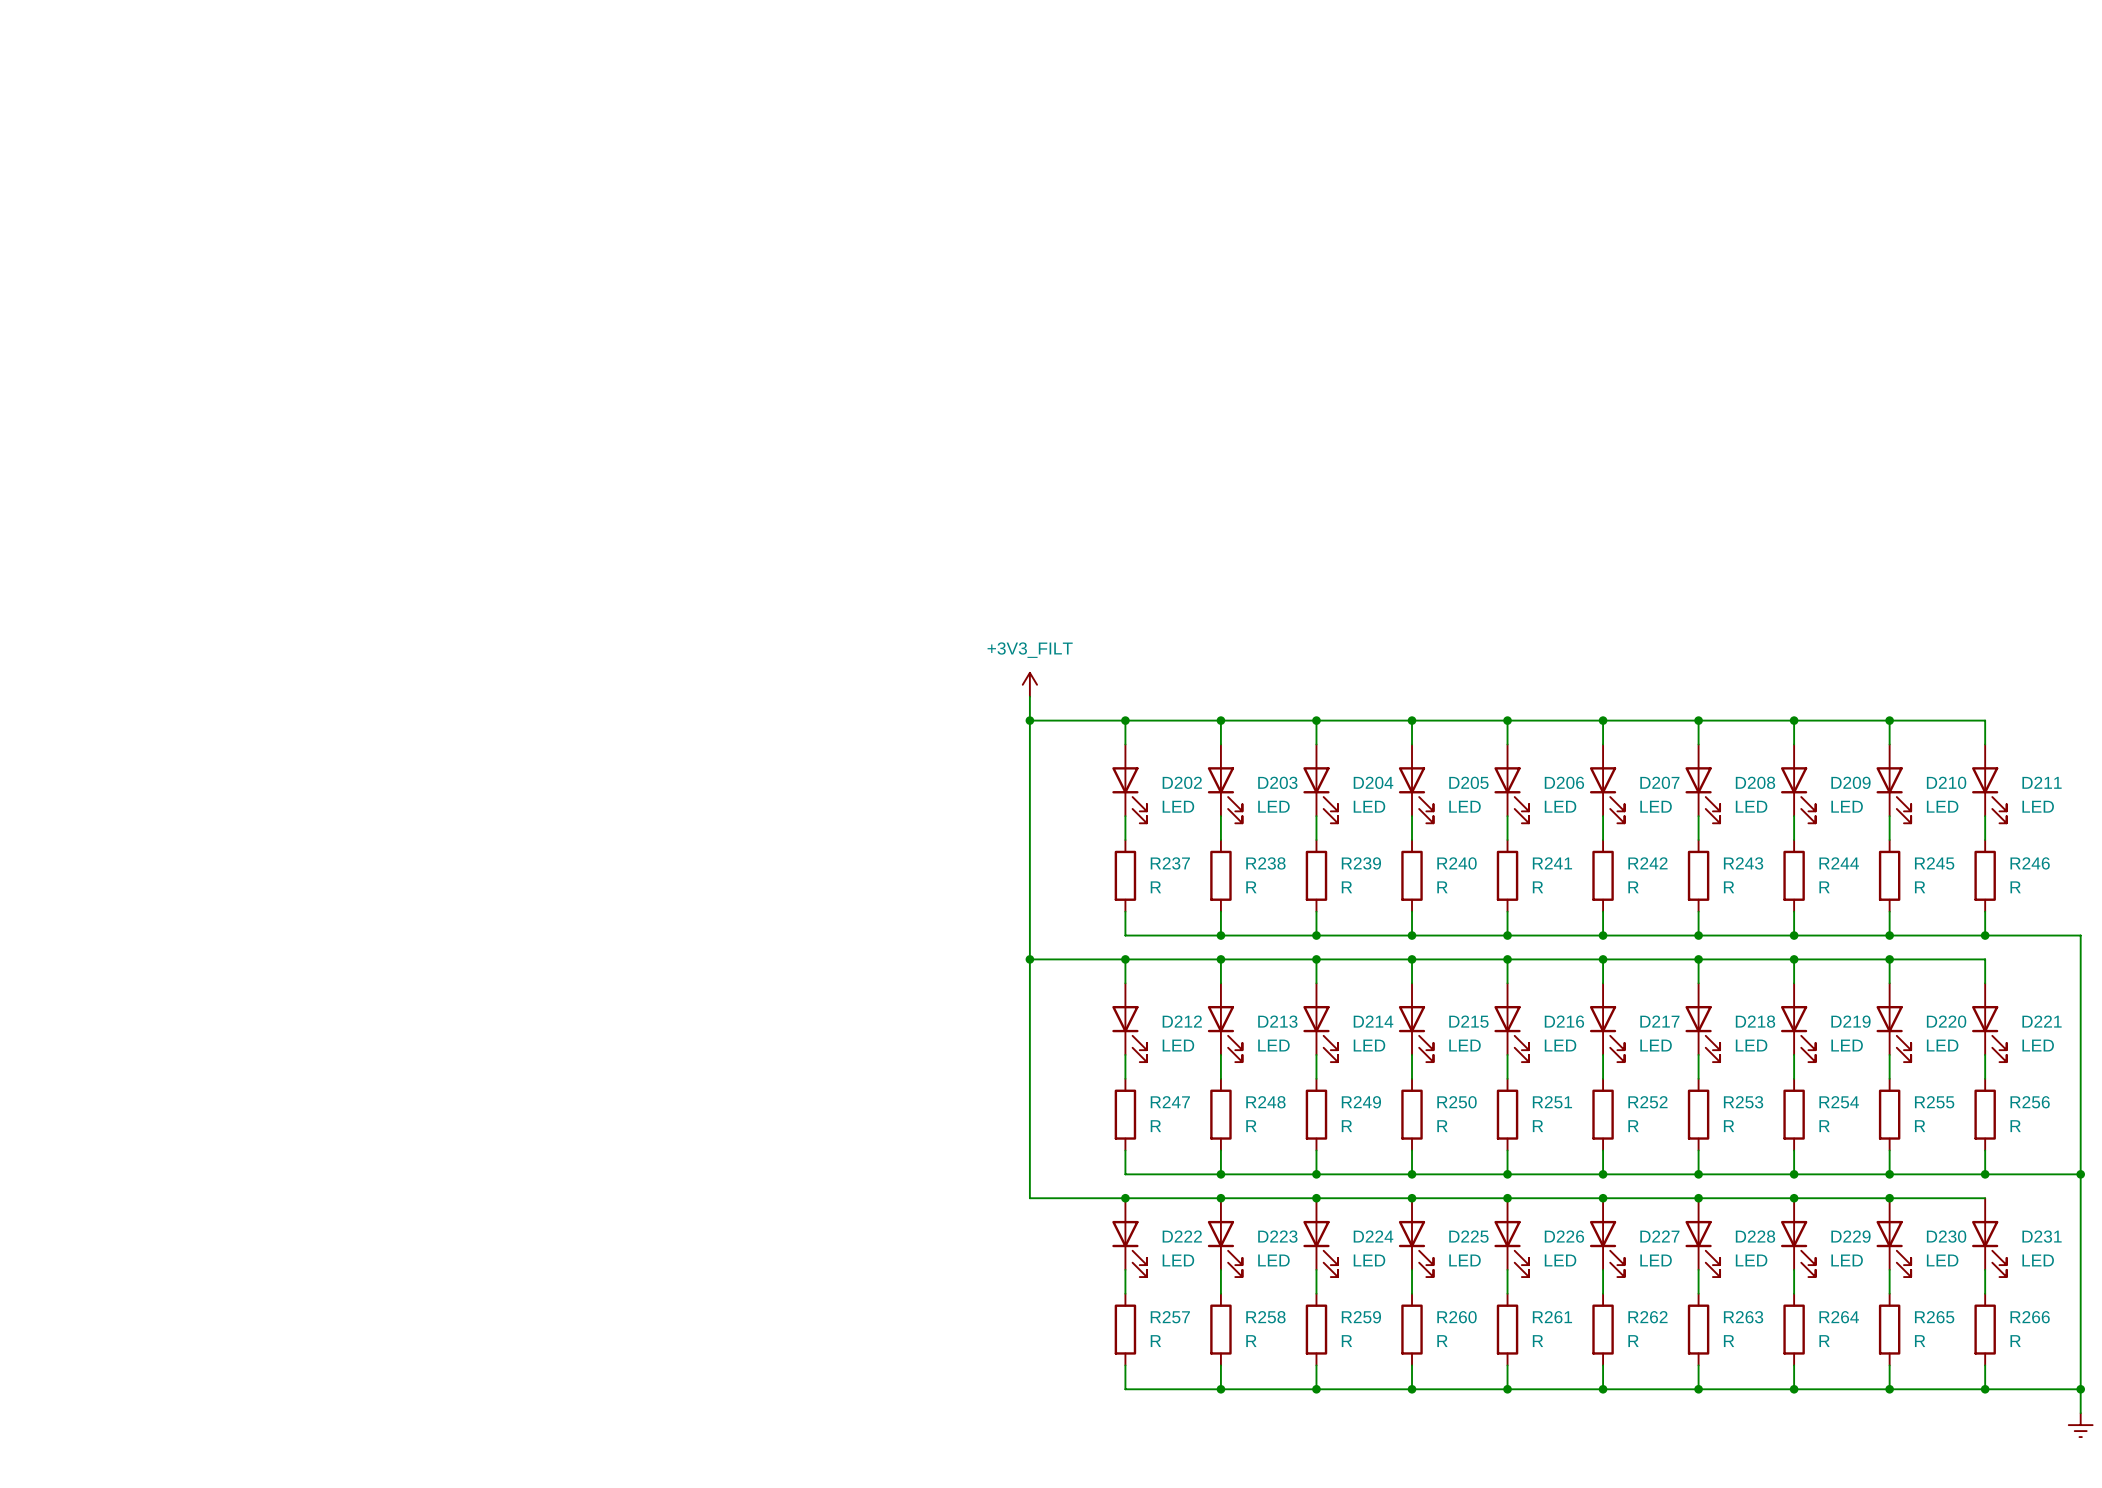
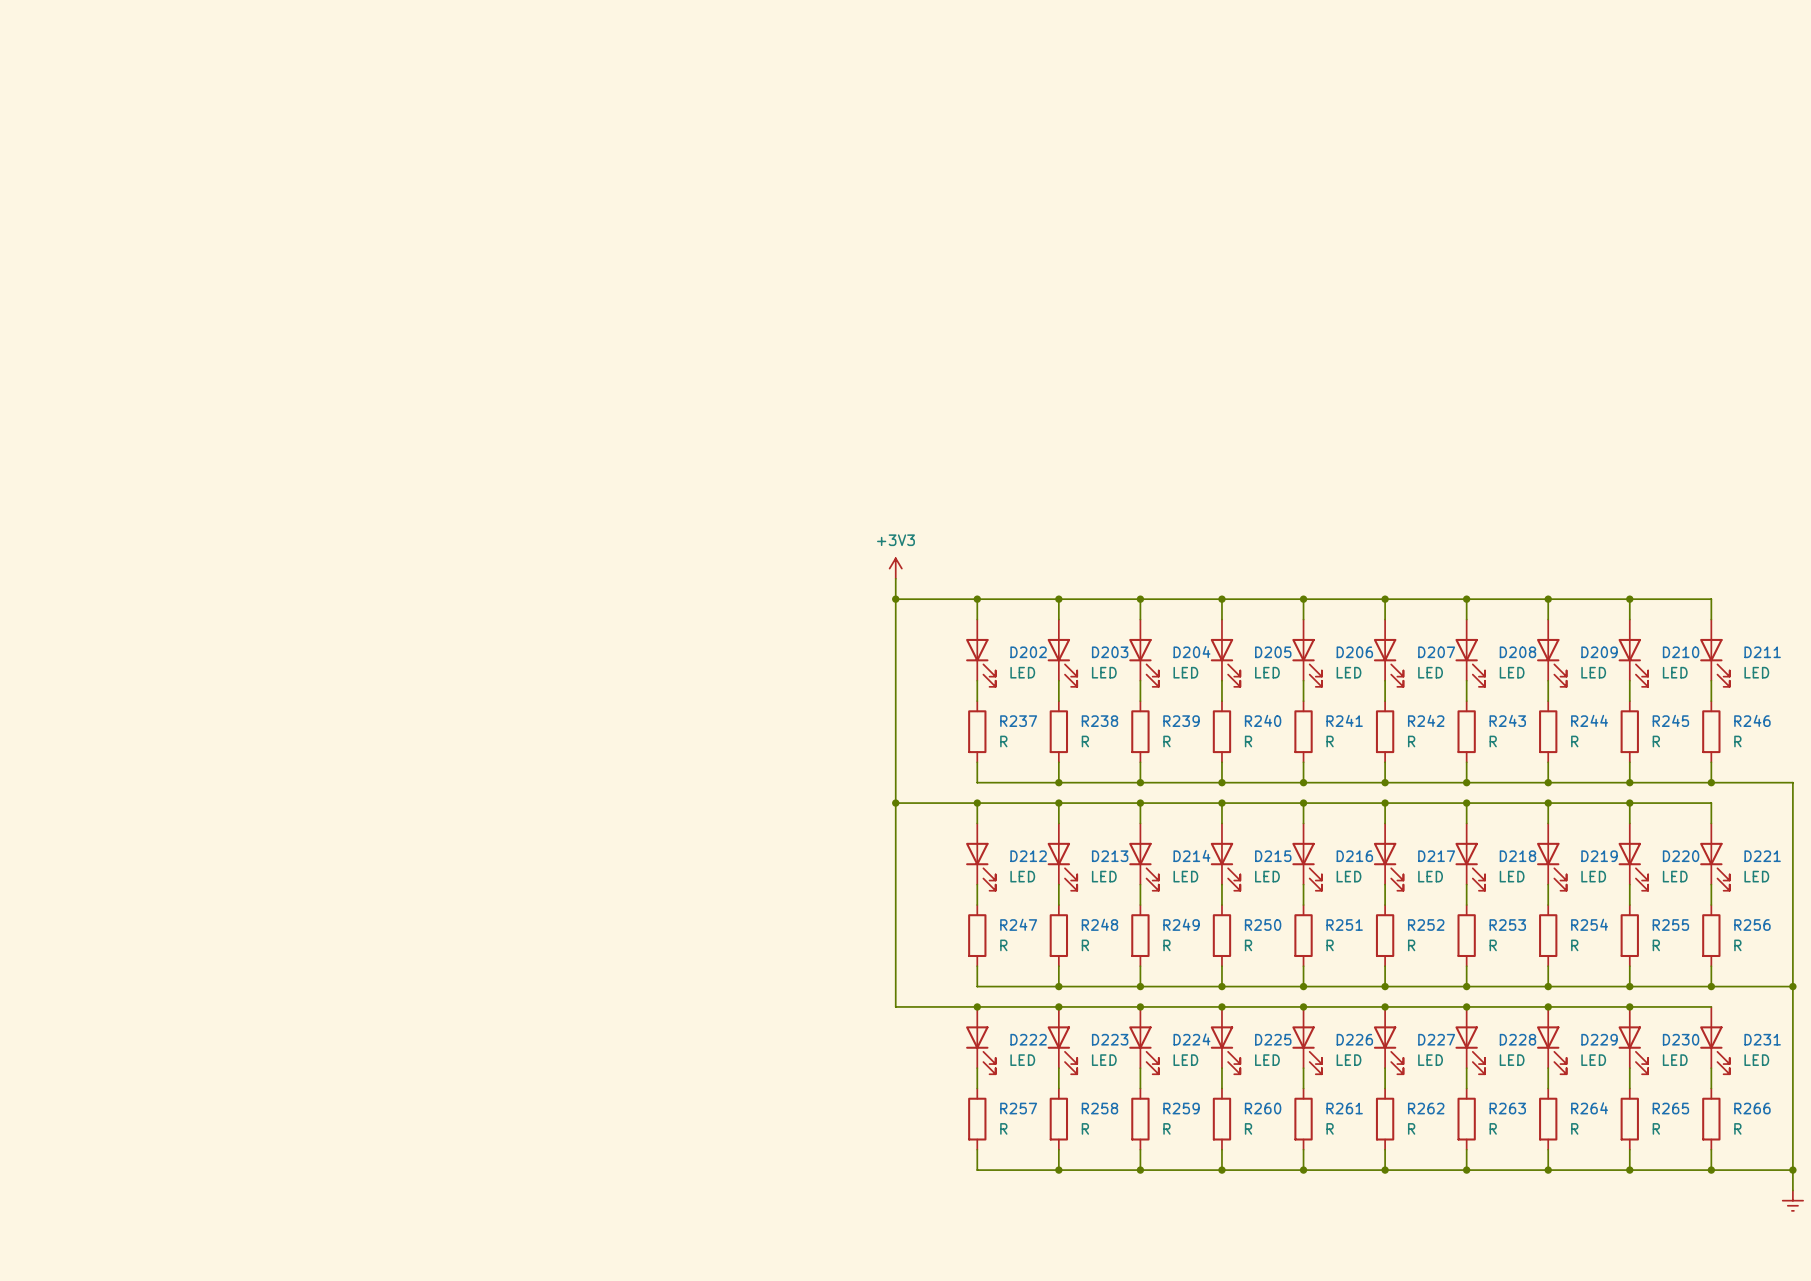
power symbol: +3V3_FILT (1029, 684) -> +3V3 (895, 568)

